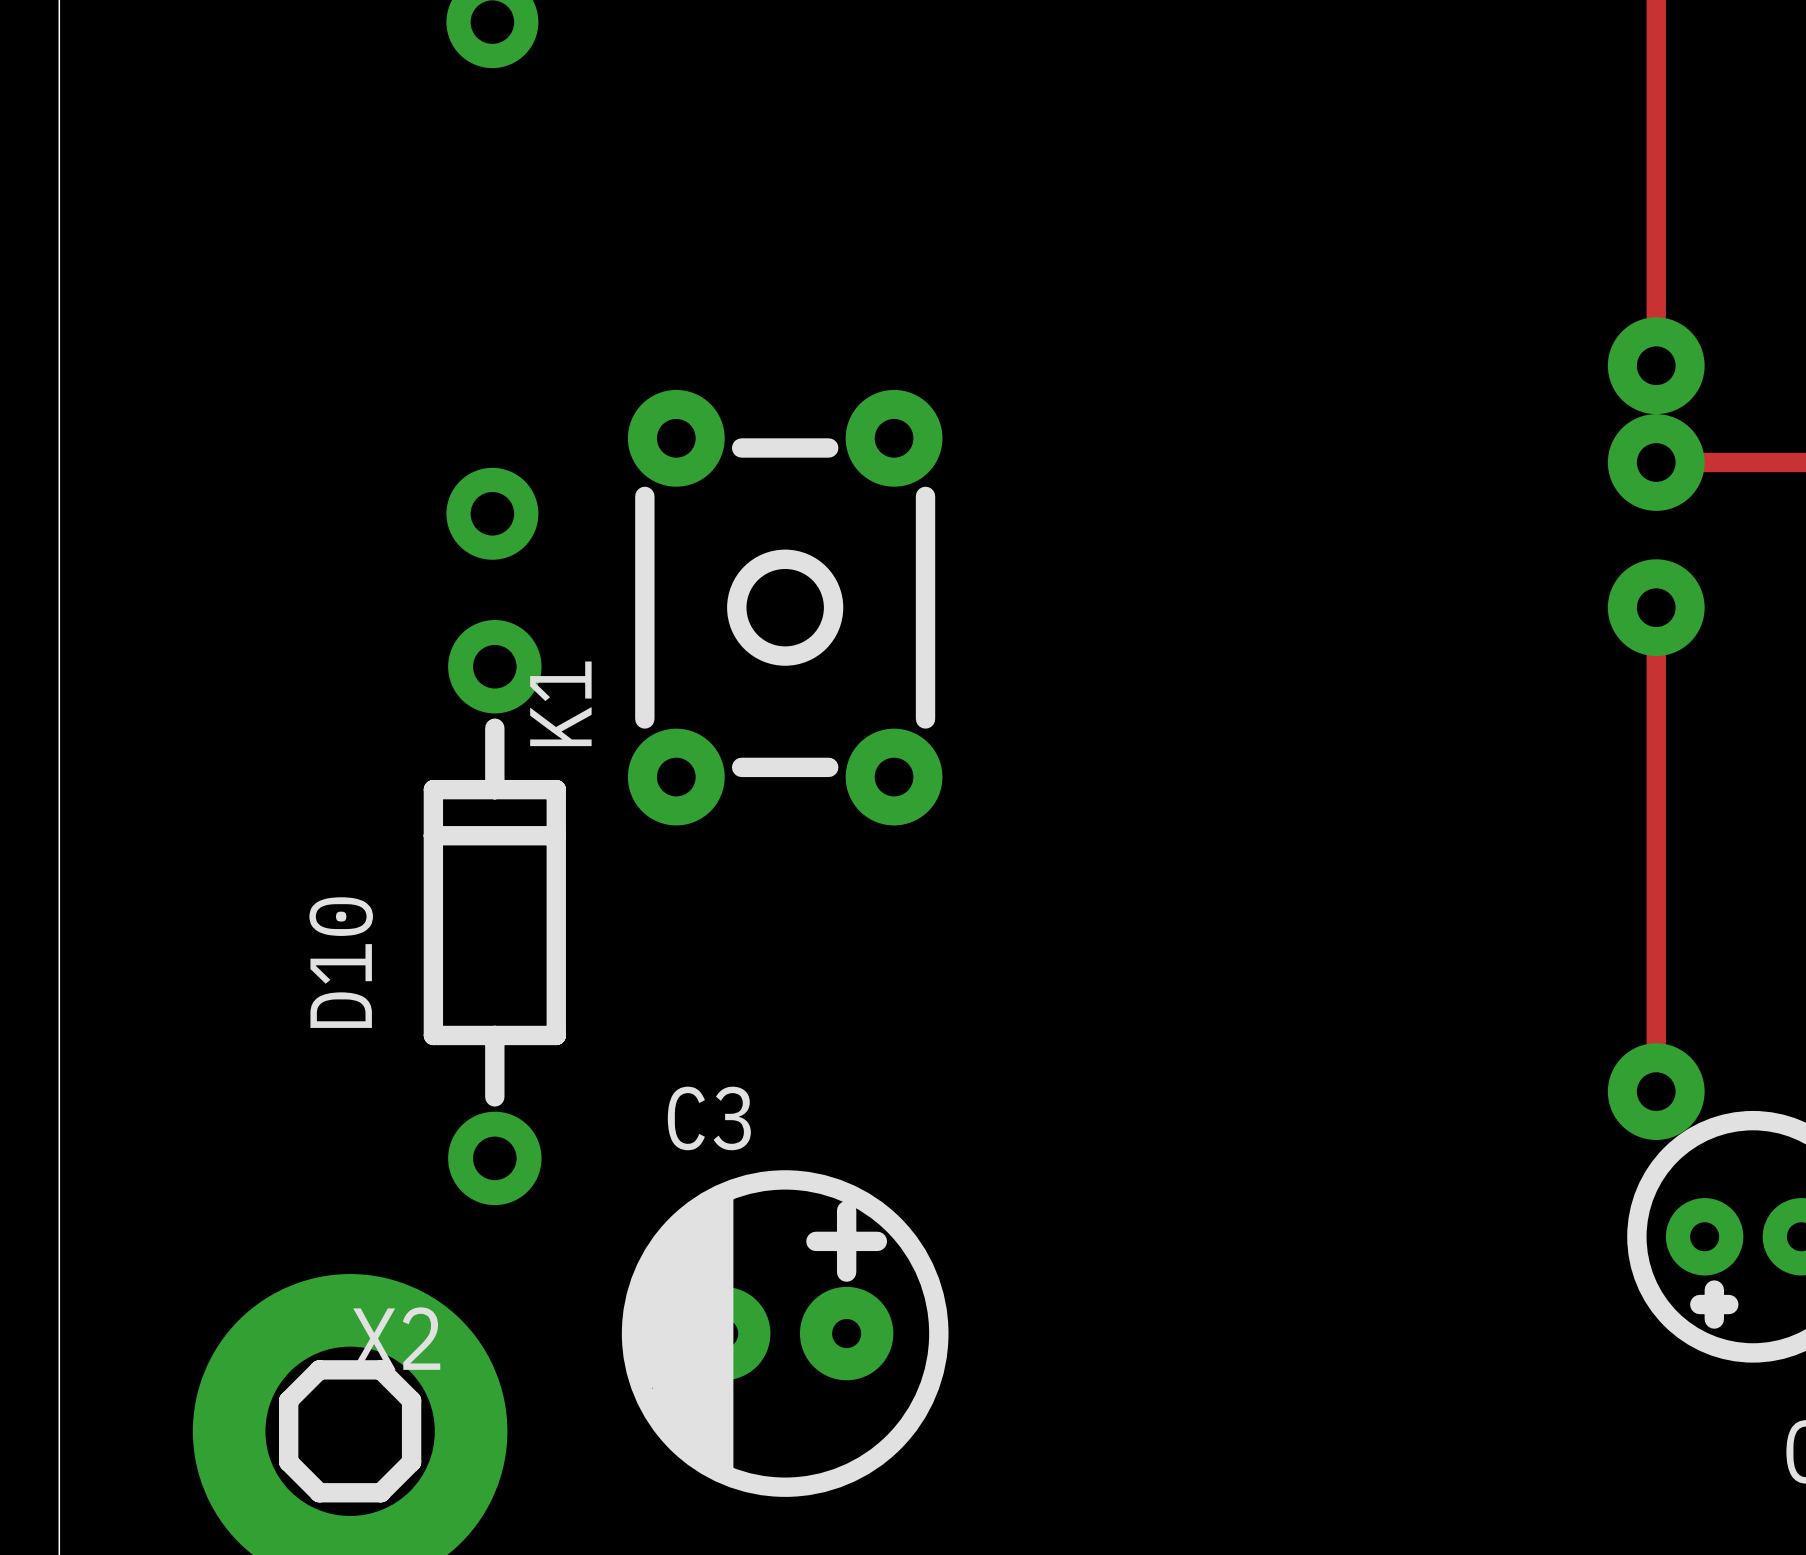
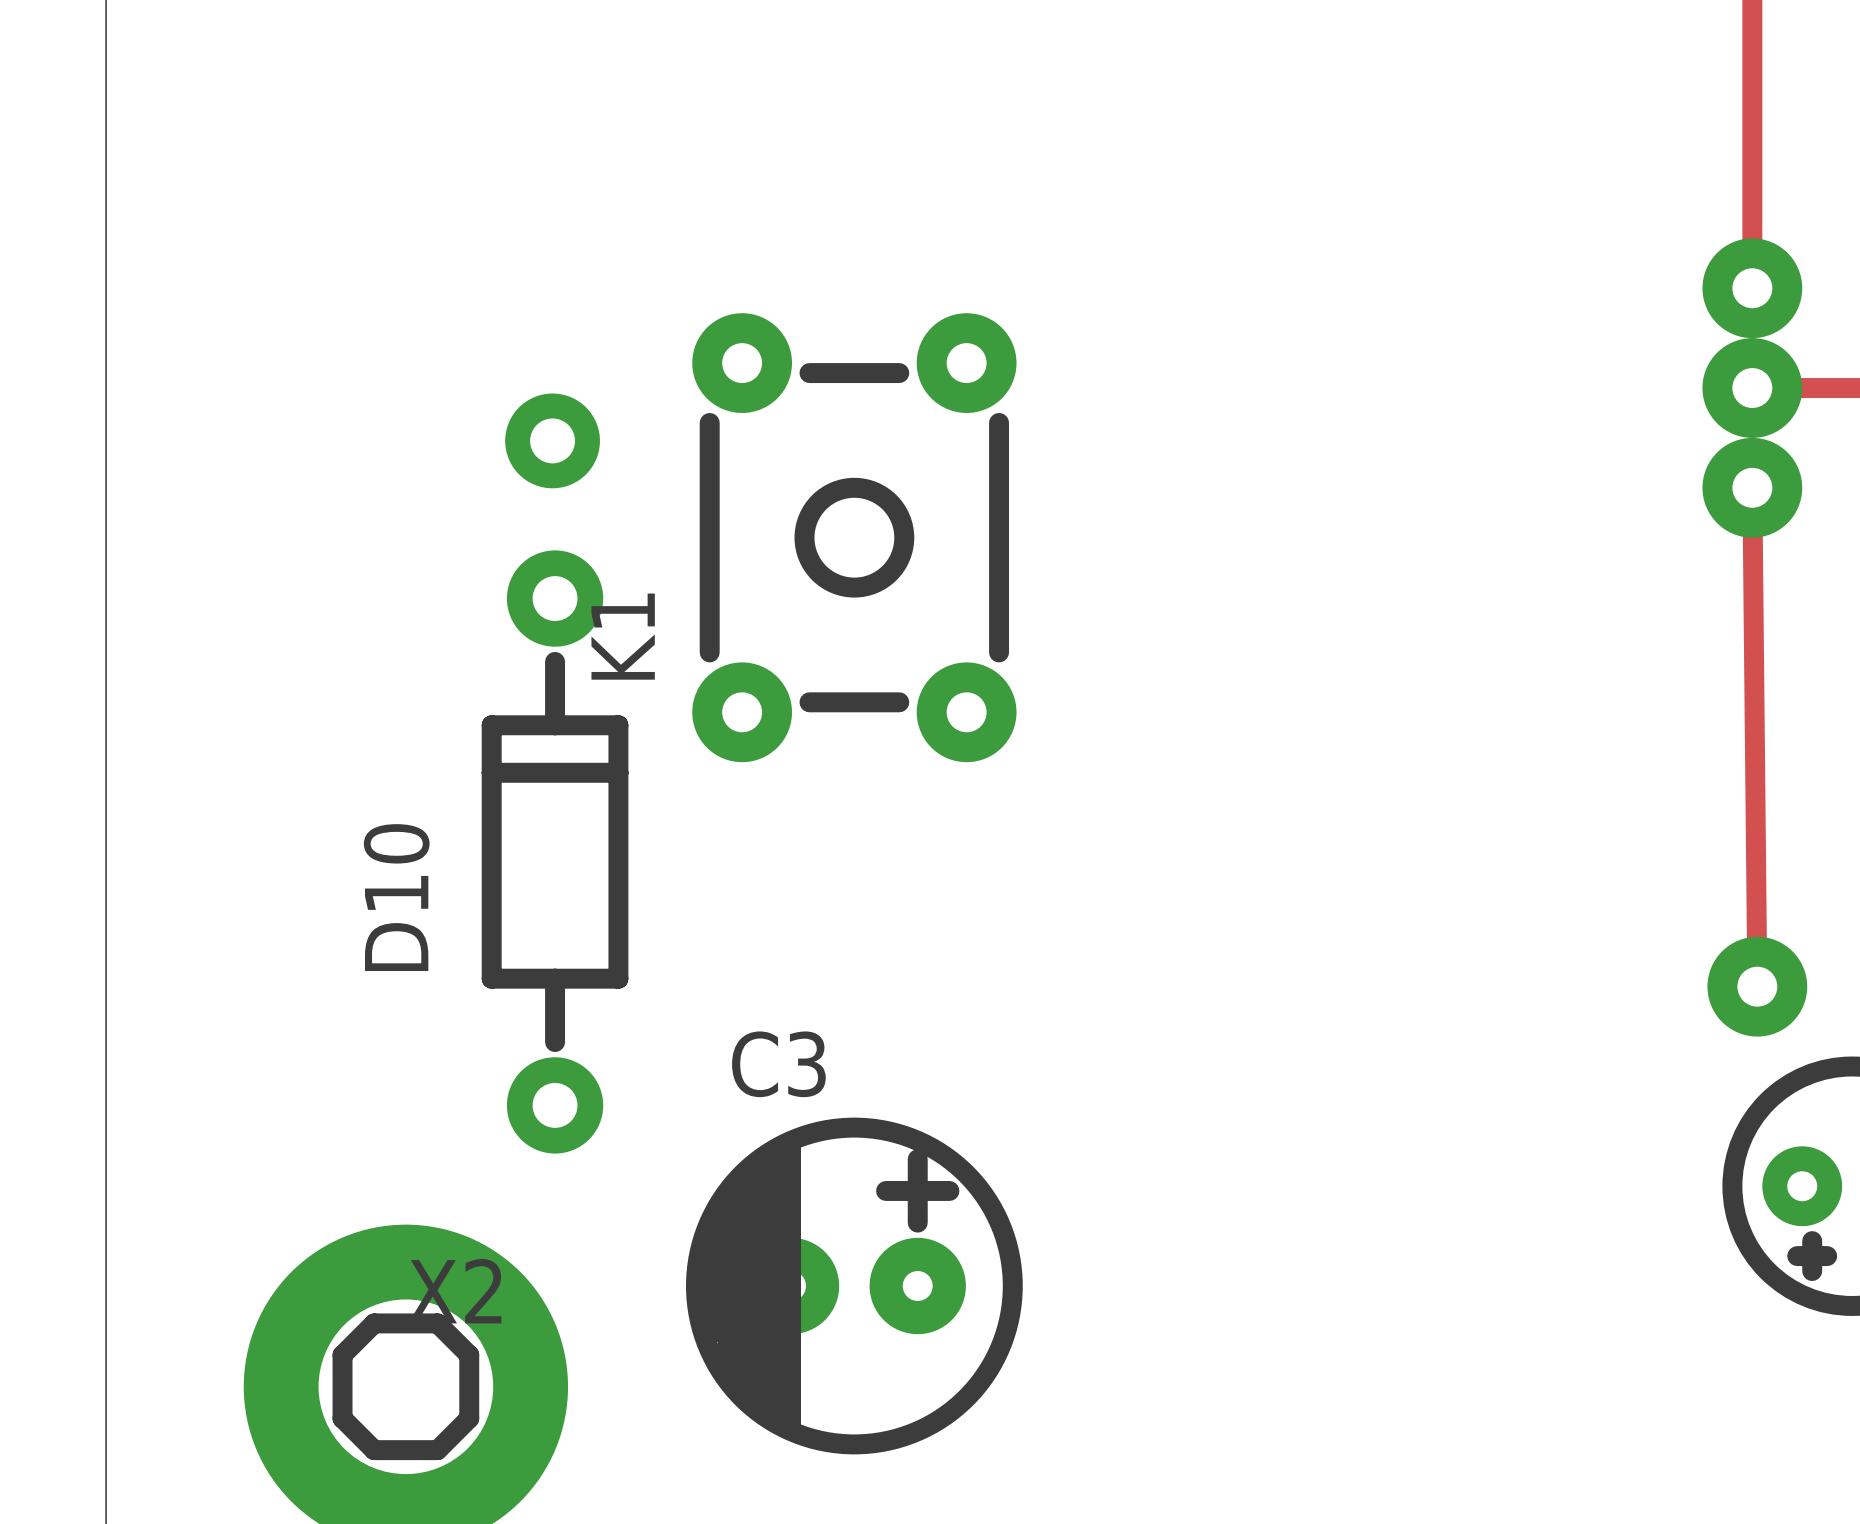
track: none -> (1752, 487) (1757, 986)
track: (1656, 607) (1656, 1091) -> none
via position: (1656, 607) -> (1752, 487)
via position: (1656, 1091) -> (1757, 986)

